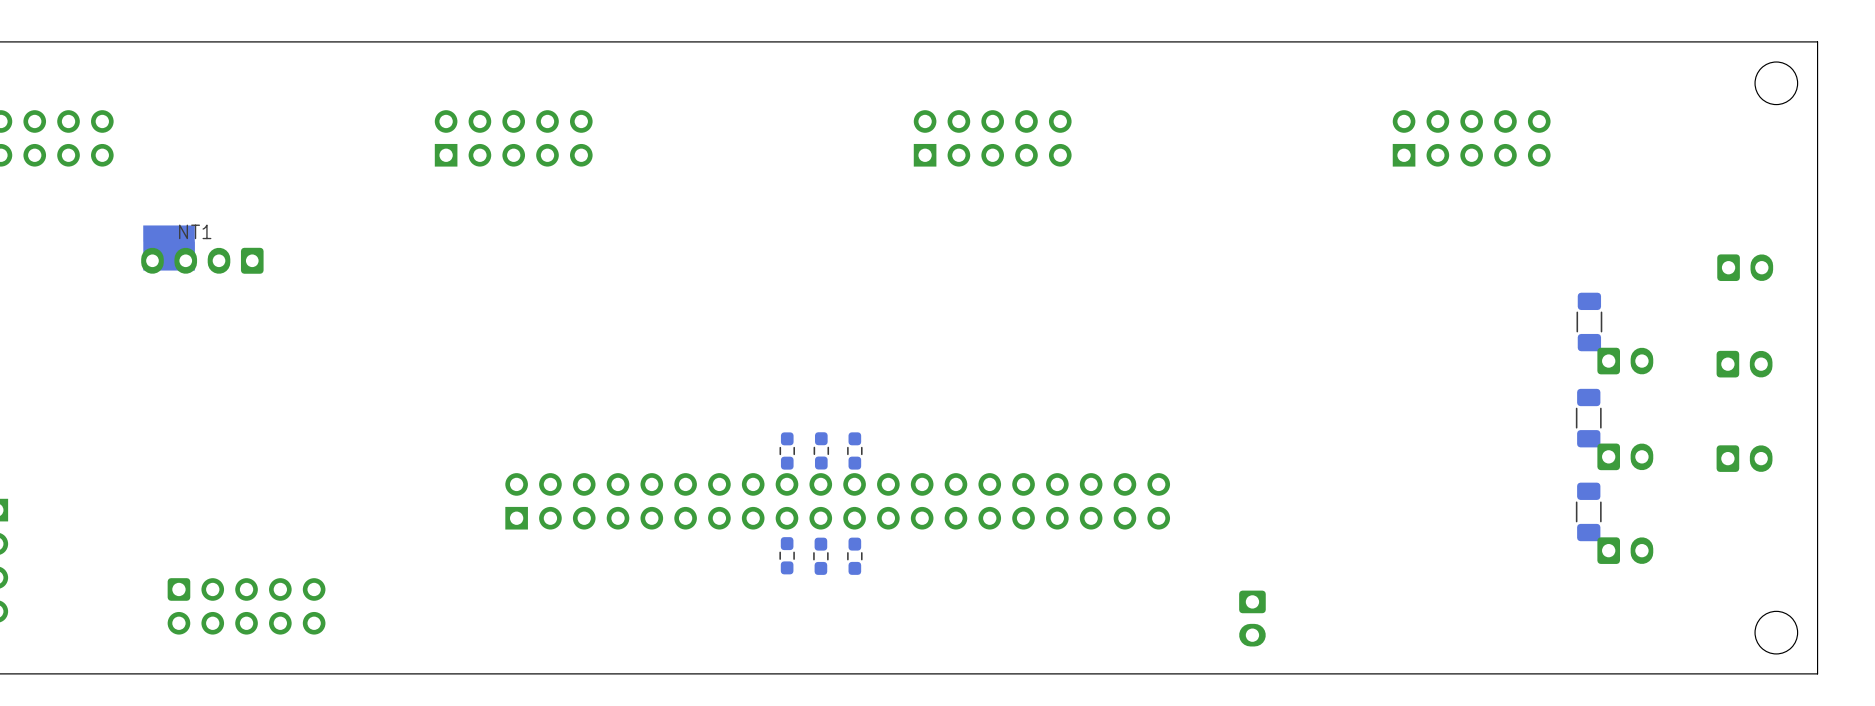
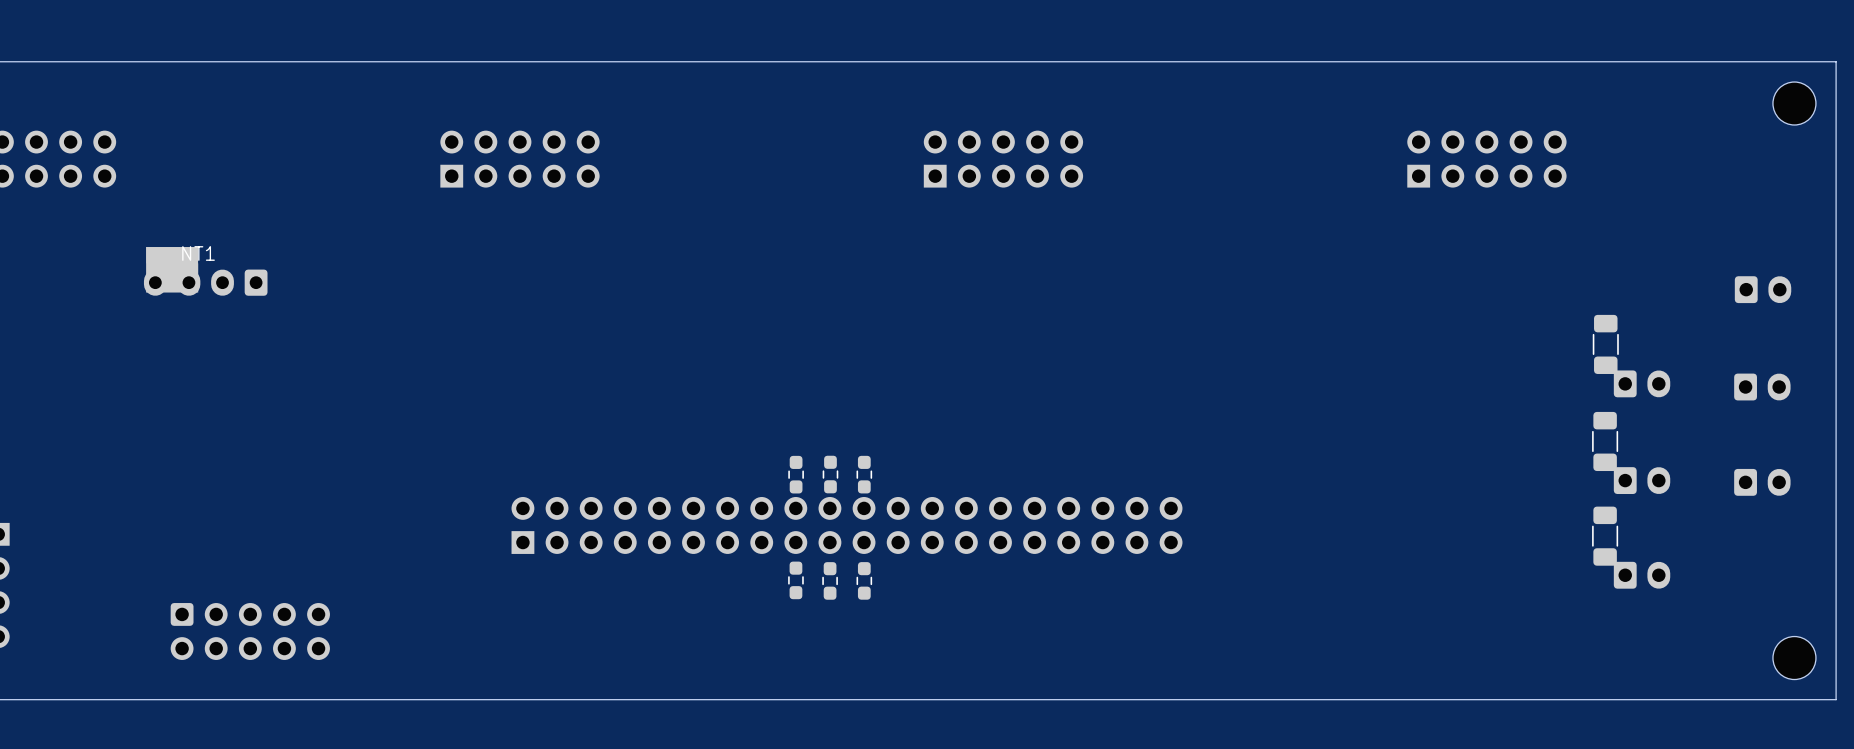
part: (1252, 618) -> none

